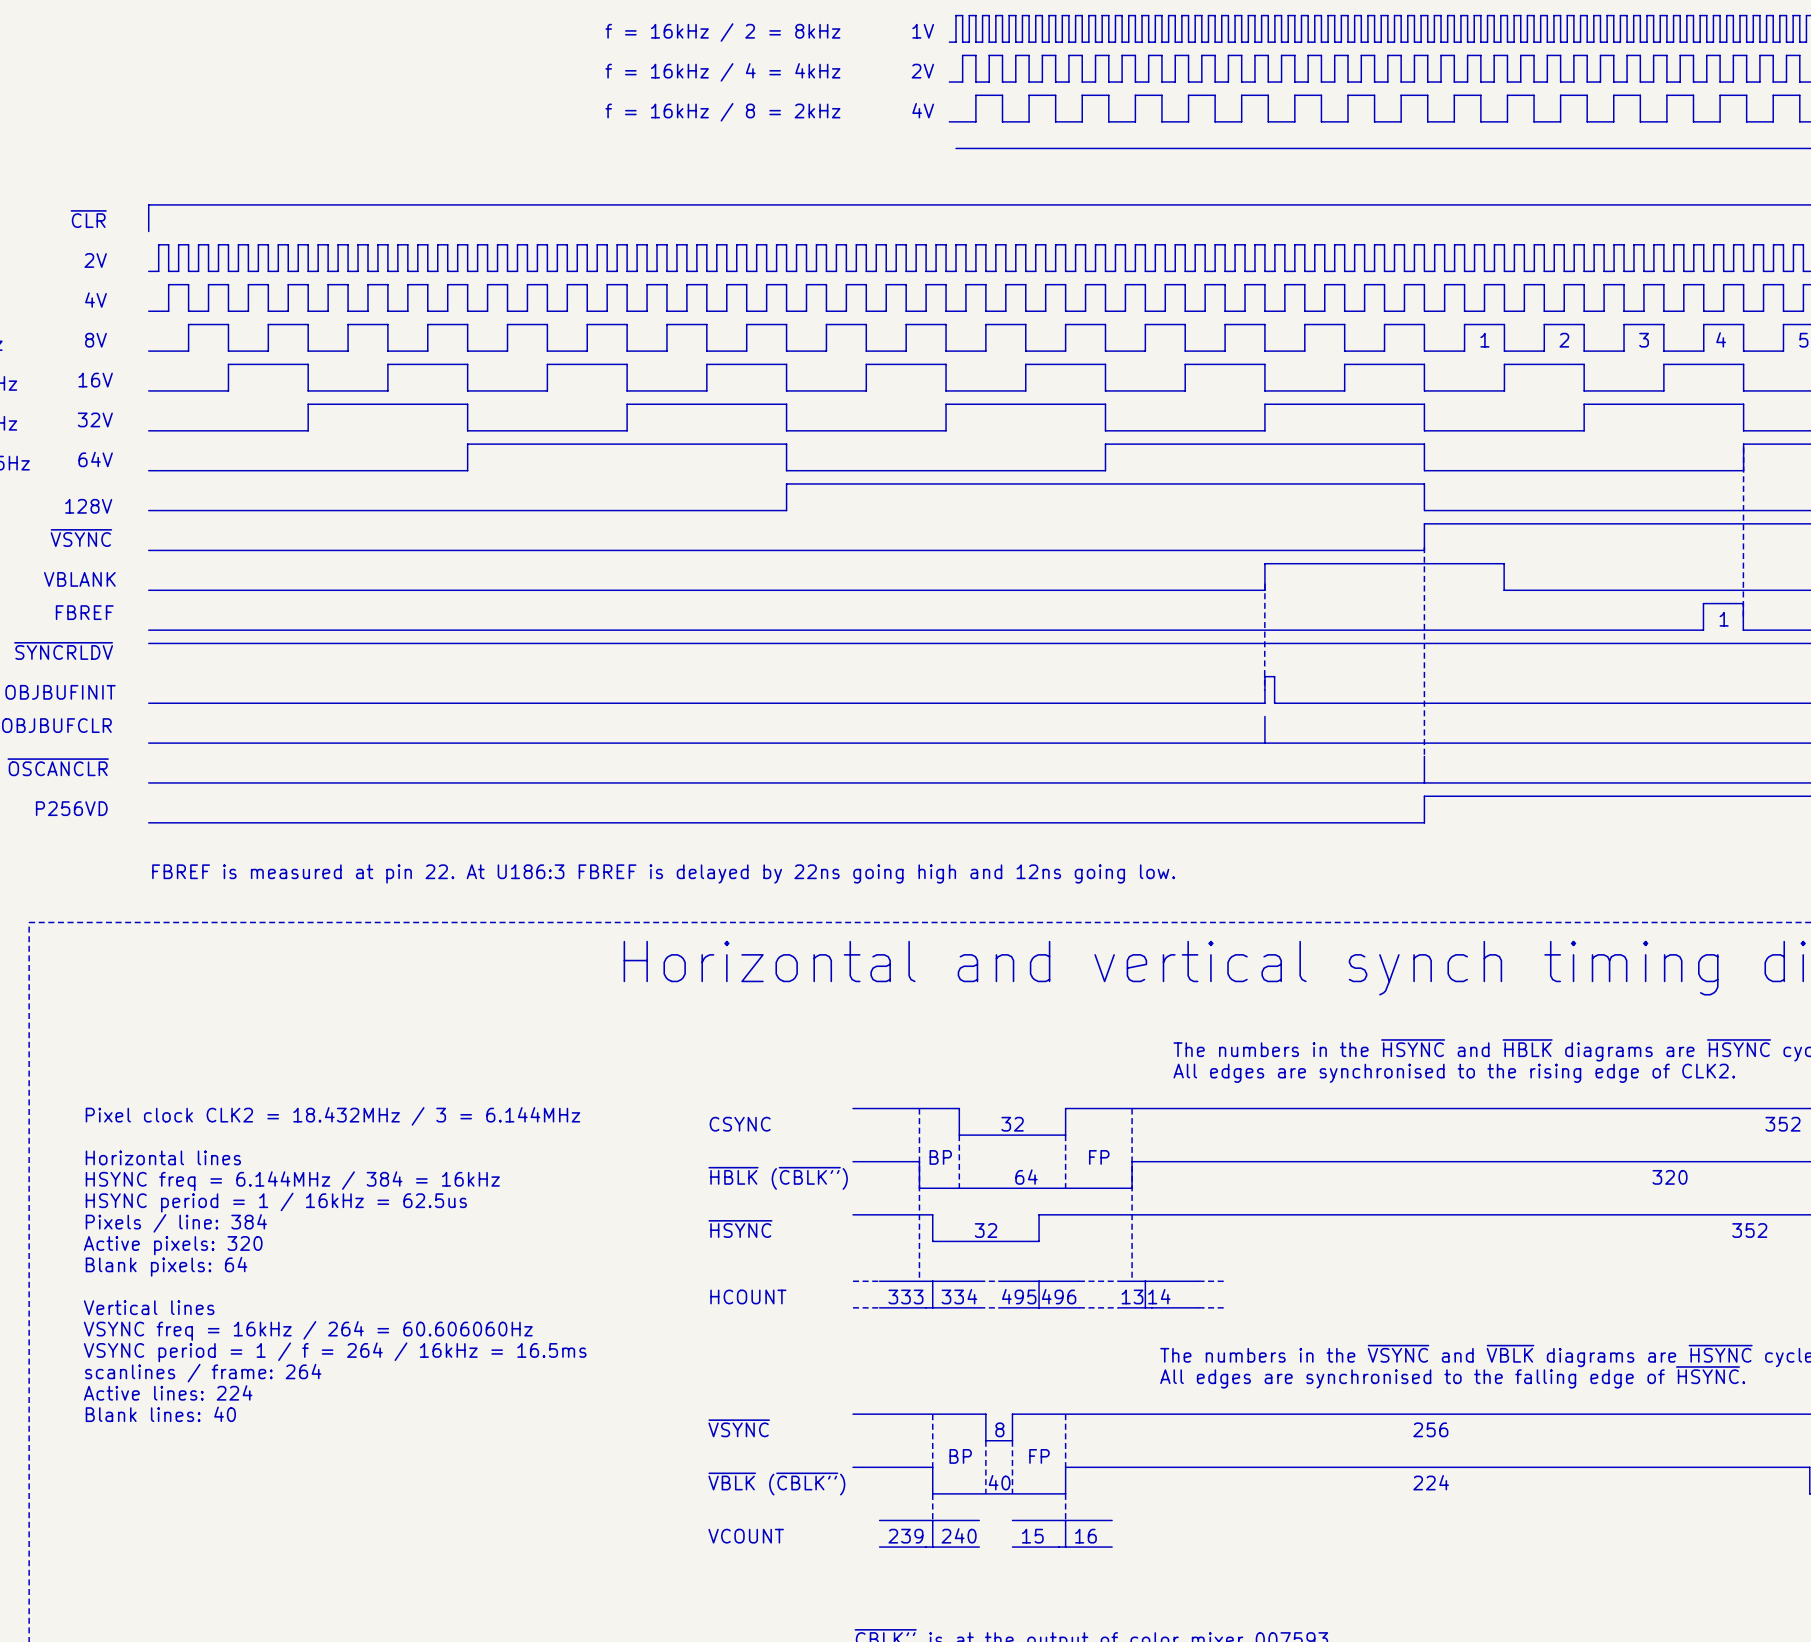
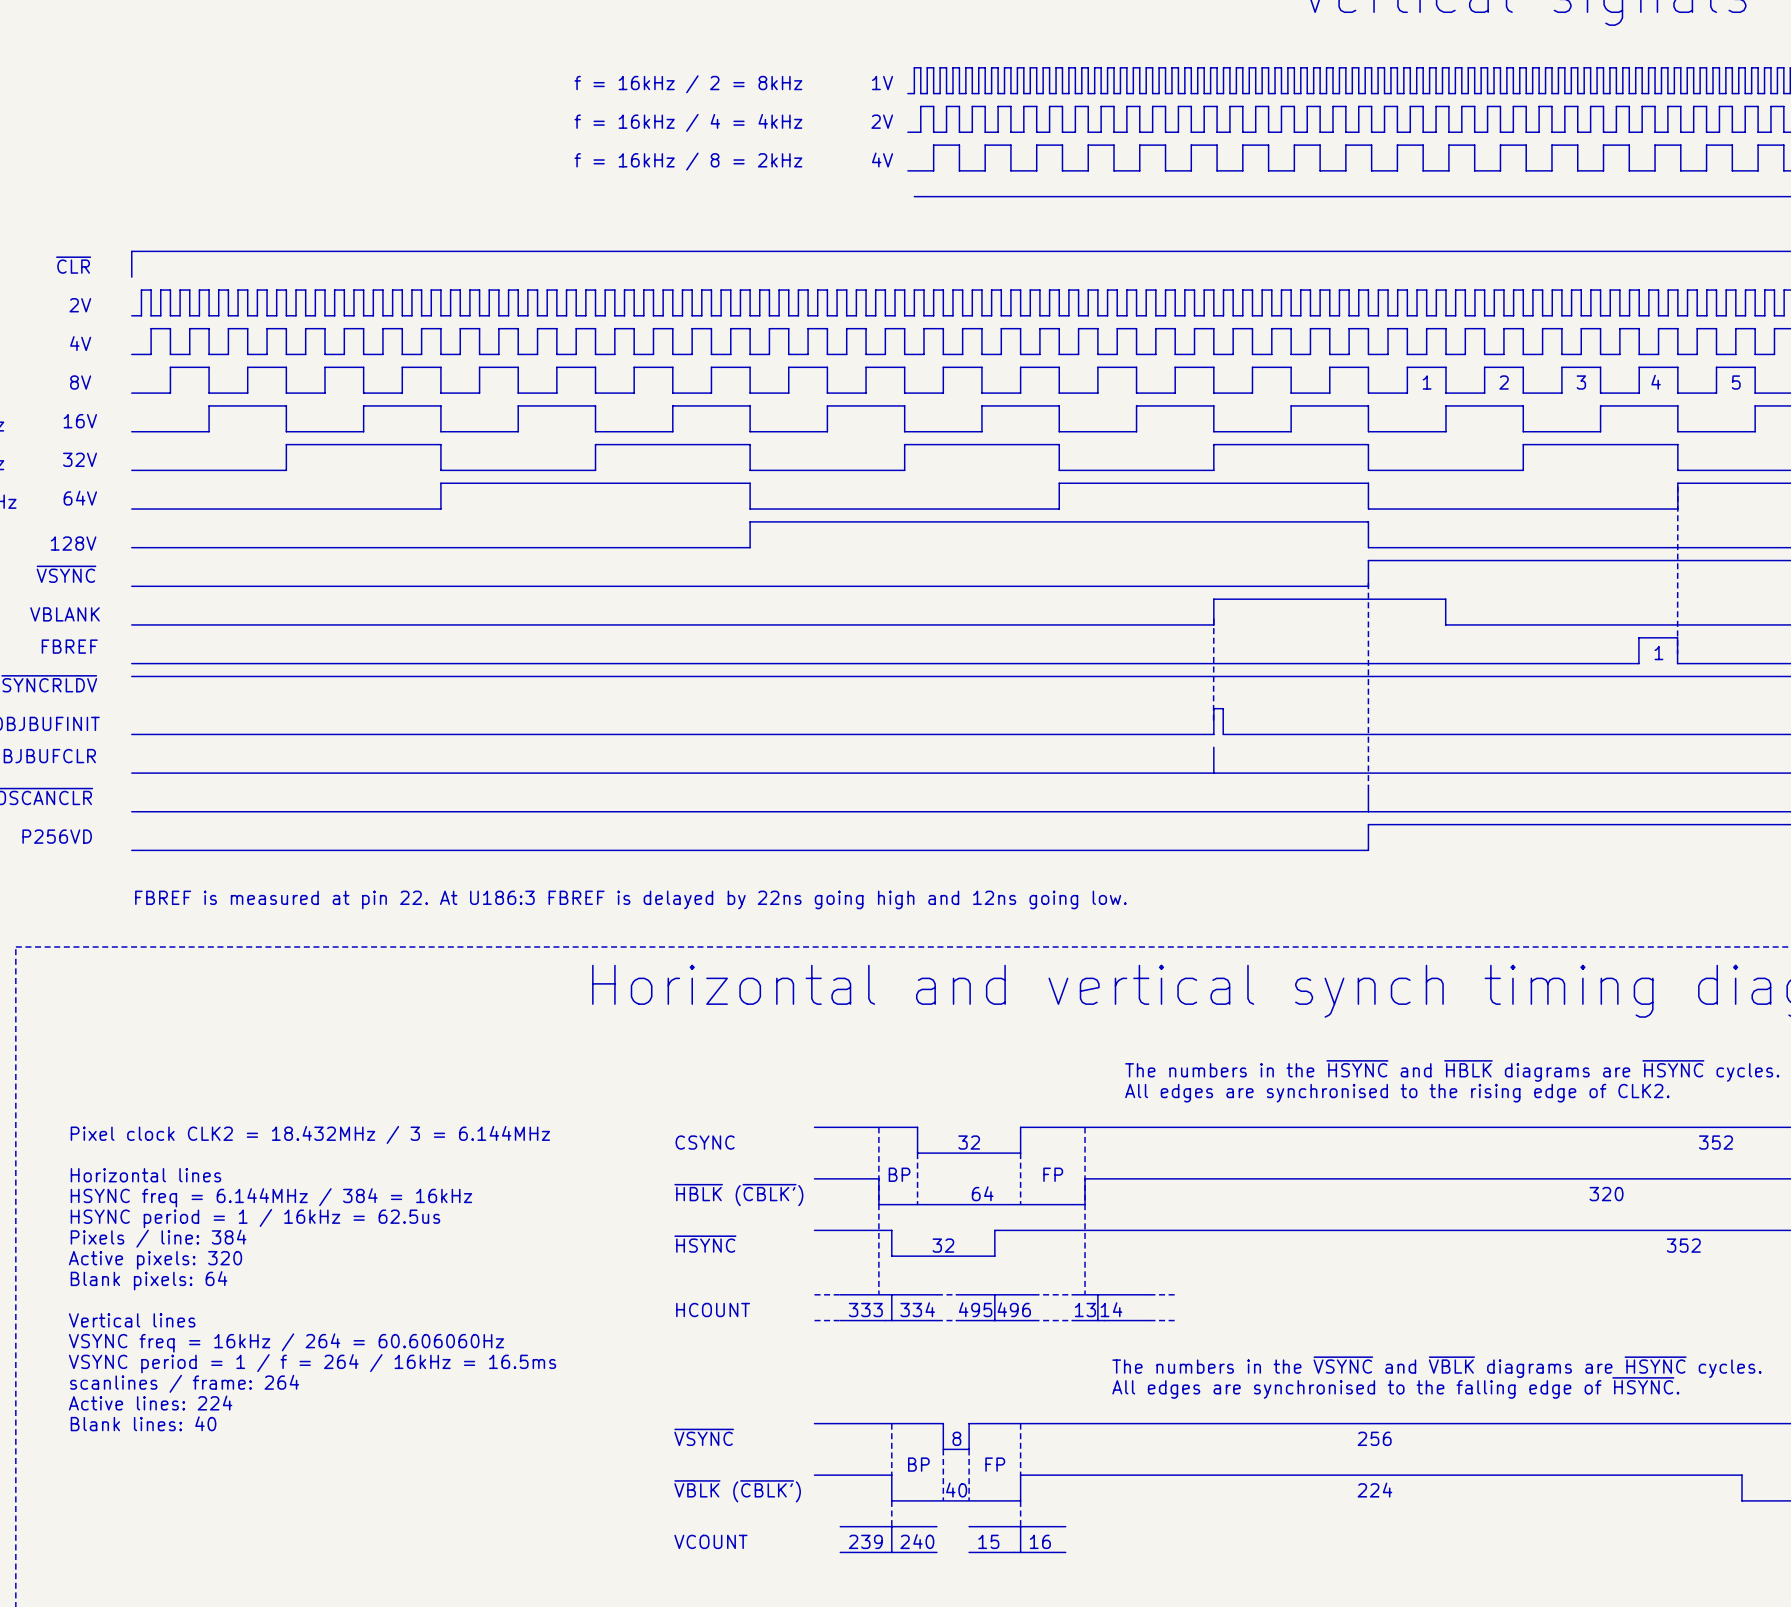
text: ~{HBLK} (~{CBLK''}) (778, 1178) -> ~{HBLK} (~{CBLK'}) (738, 1195)
text: ~{VBLK} (~{CBLK''}) (776, 1484) -> ~{VBLK} (~{CBLK'}) (737, 1491)

